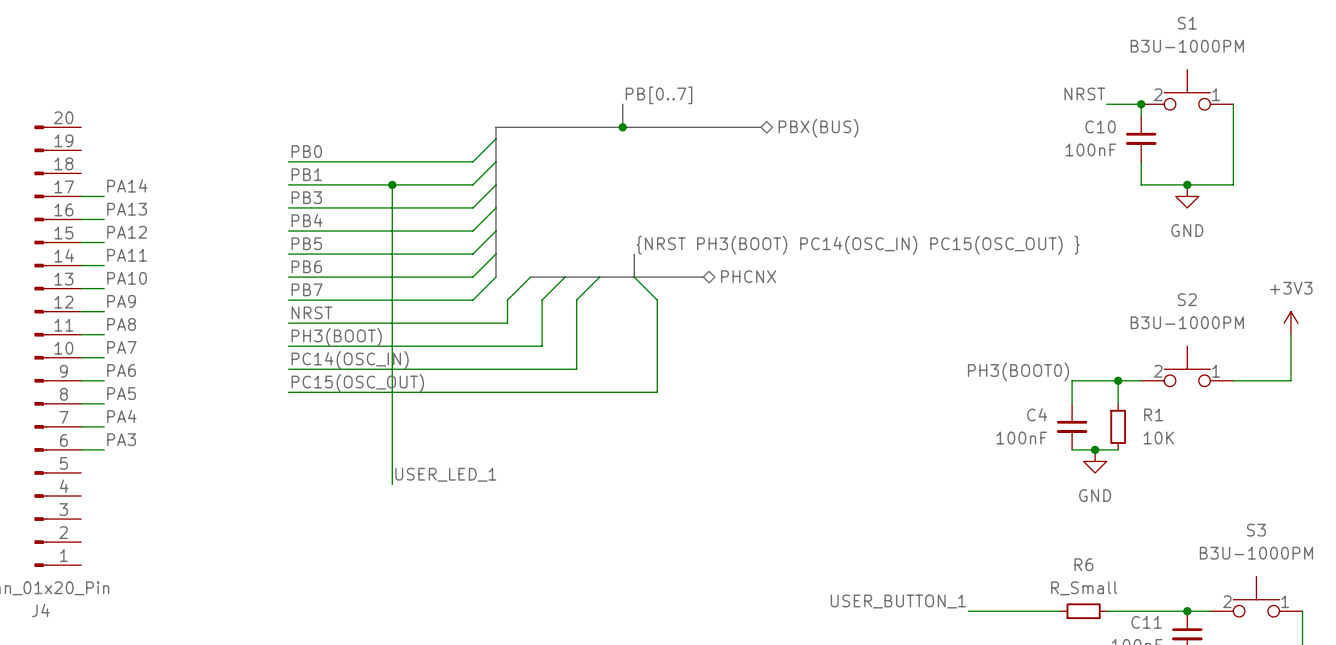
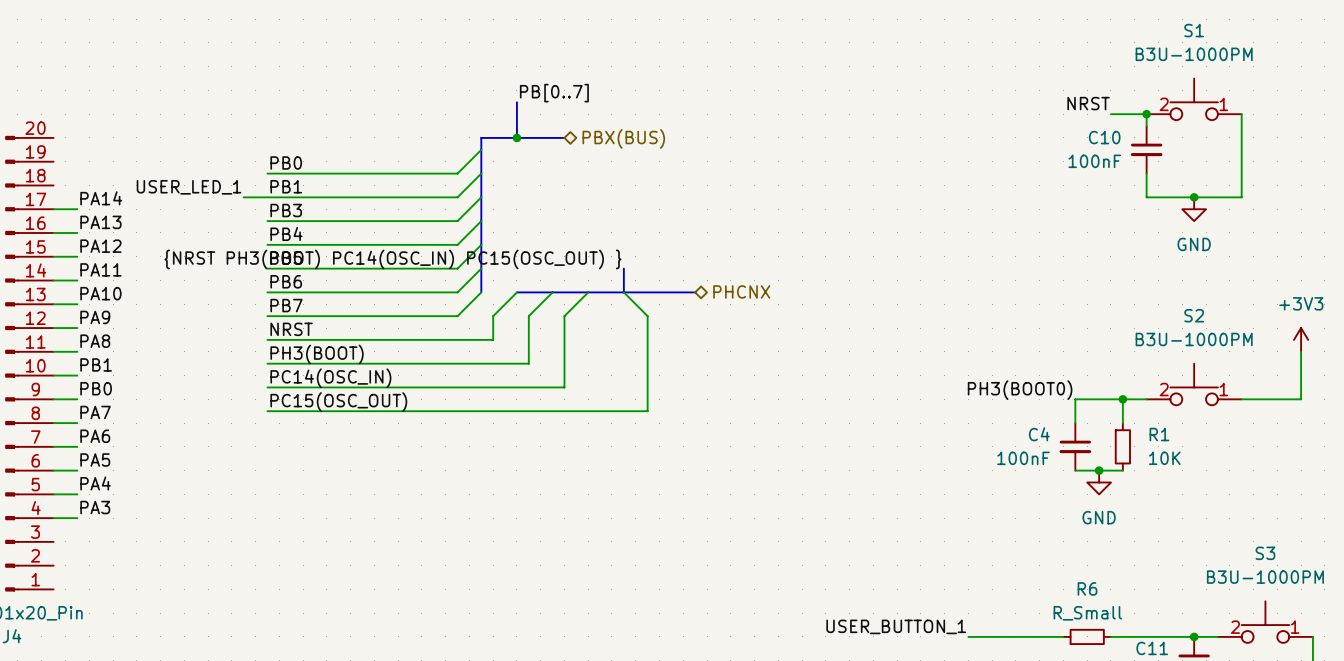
bus: none -> (516, 102) (516, 137)
label position: PB[0..7] (659, 95) -> PB[0..7] (554, 93)
bus: (622, 104) (622, 127) -> none
junction: none -> (516, 137)
bus: (576, 127) (760, 127) -> none
junction: (622, 127) -> none
hierarchical label position: PBX(BUS) (818, 128) -> PBX(BUS) (623, 138)
label: none -> USER_LED_1 (189, 187)
wire: none -> (243, 197) (267, 197)
wire: (392, 184) (392, 484) -> none
junction: (392, 184) -> none
label position: {NRST PH3(BOOT) PC14(OSC_IN) PC15(OSC_OUT) } (858, 245) -> {NRST PH3(BOOT) PC14(OSC_IN) PC15(OSC_OUT) } (392, 259)
label: PA7 (121, 347) -> PB1 (96, 364)
label: PA6 (121, 370) -> PB0 (96, 388)
label: PA5 (121, 393) -> PA7 (95, 412)
label: PA4 (121, 416) -> PA6 (95, 436)
label: PA3 (121, 439) -> PA5 (95, 460)
label: none -> PA4 (95, 483)
wire: none -> (53, 494) (77, 494)
label: USER_LED_1 (445, 474) -> none
label: none -> PA3 (95, 507)
wire: none -> (53, 518) (77, 518)

